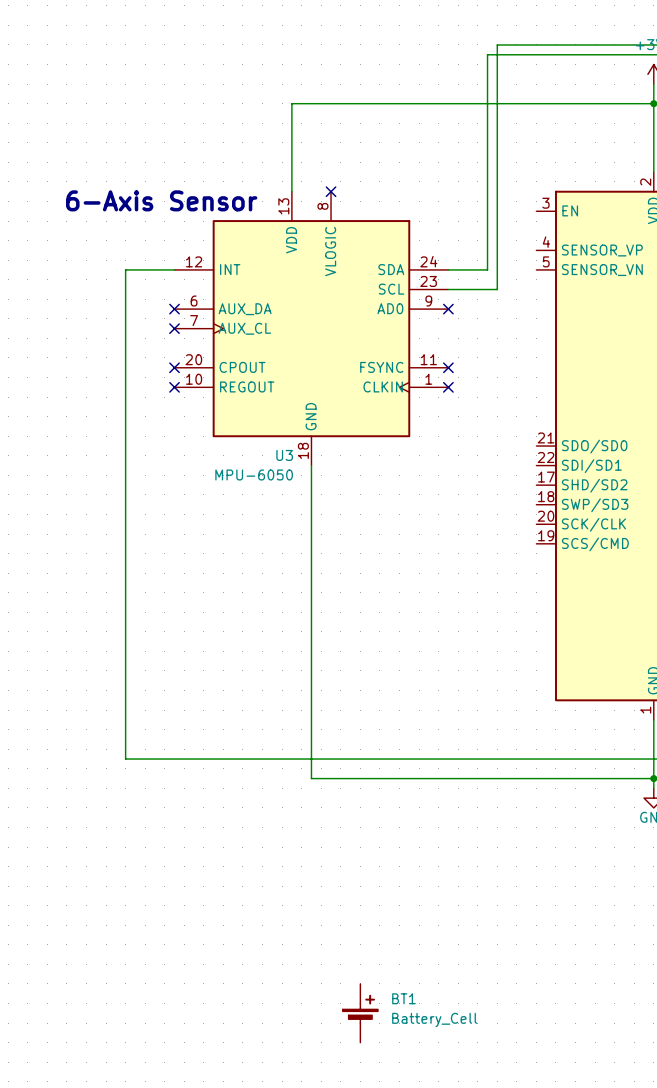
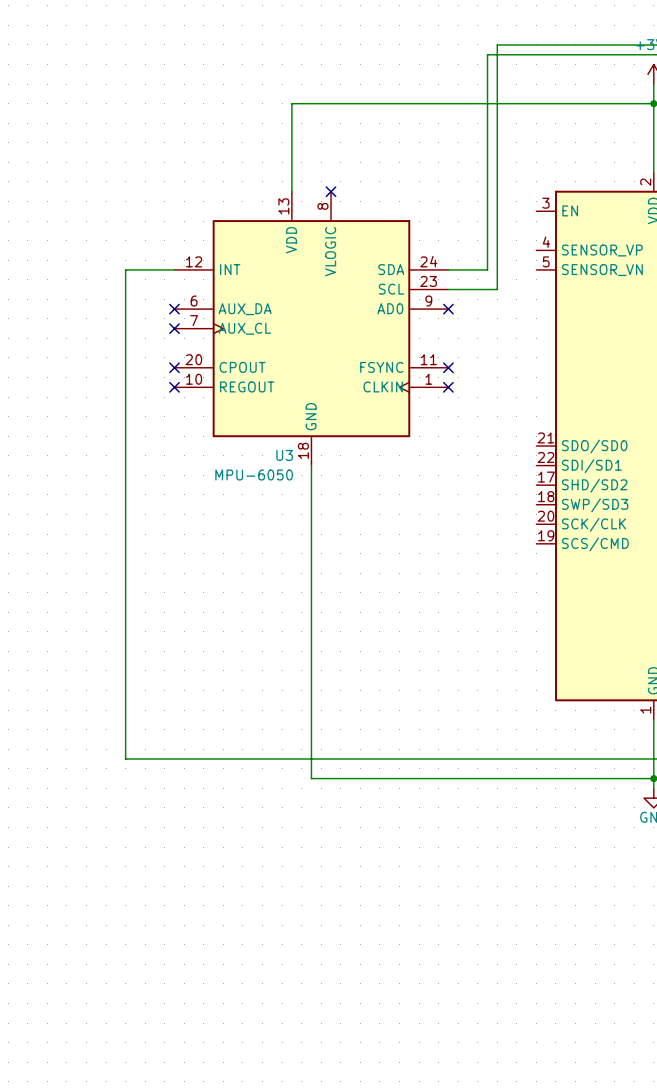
text: 6-Axis Sensor (161, 200) -> none
BT1: Battery_Cell (360, 1013) -> none

